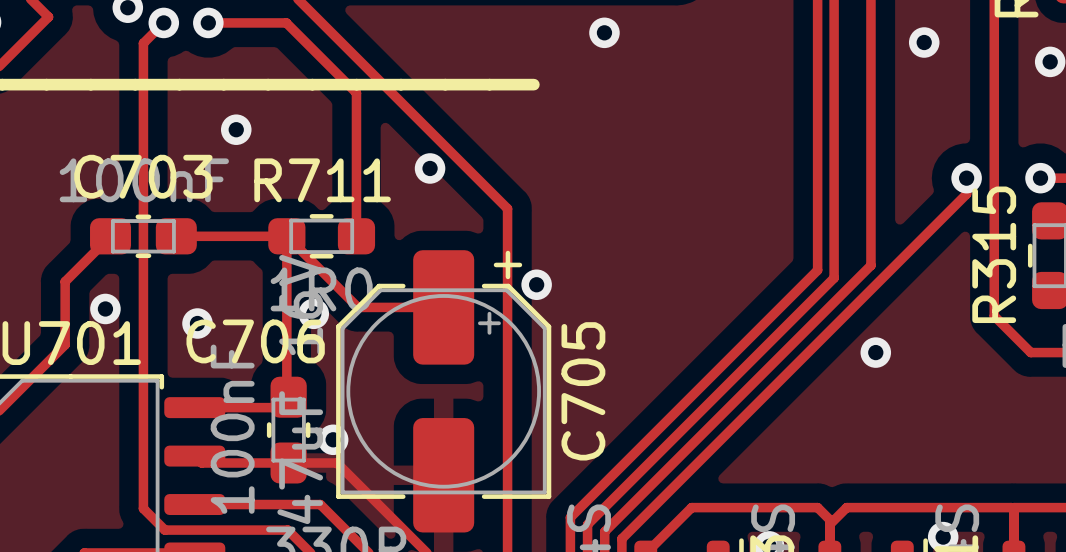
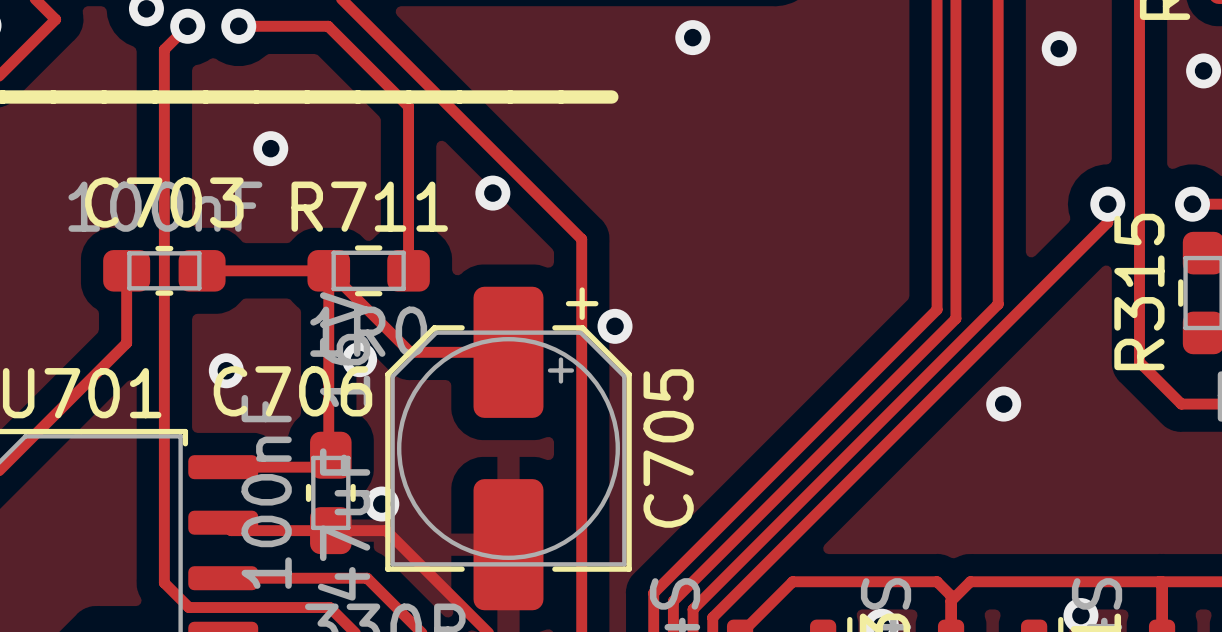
track: (110, 236) (65, 281) (65, 344) -> (126, 270) (126, 343) (74, 395)
via: (105, 308) -> none

